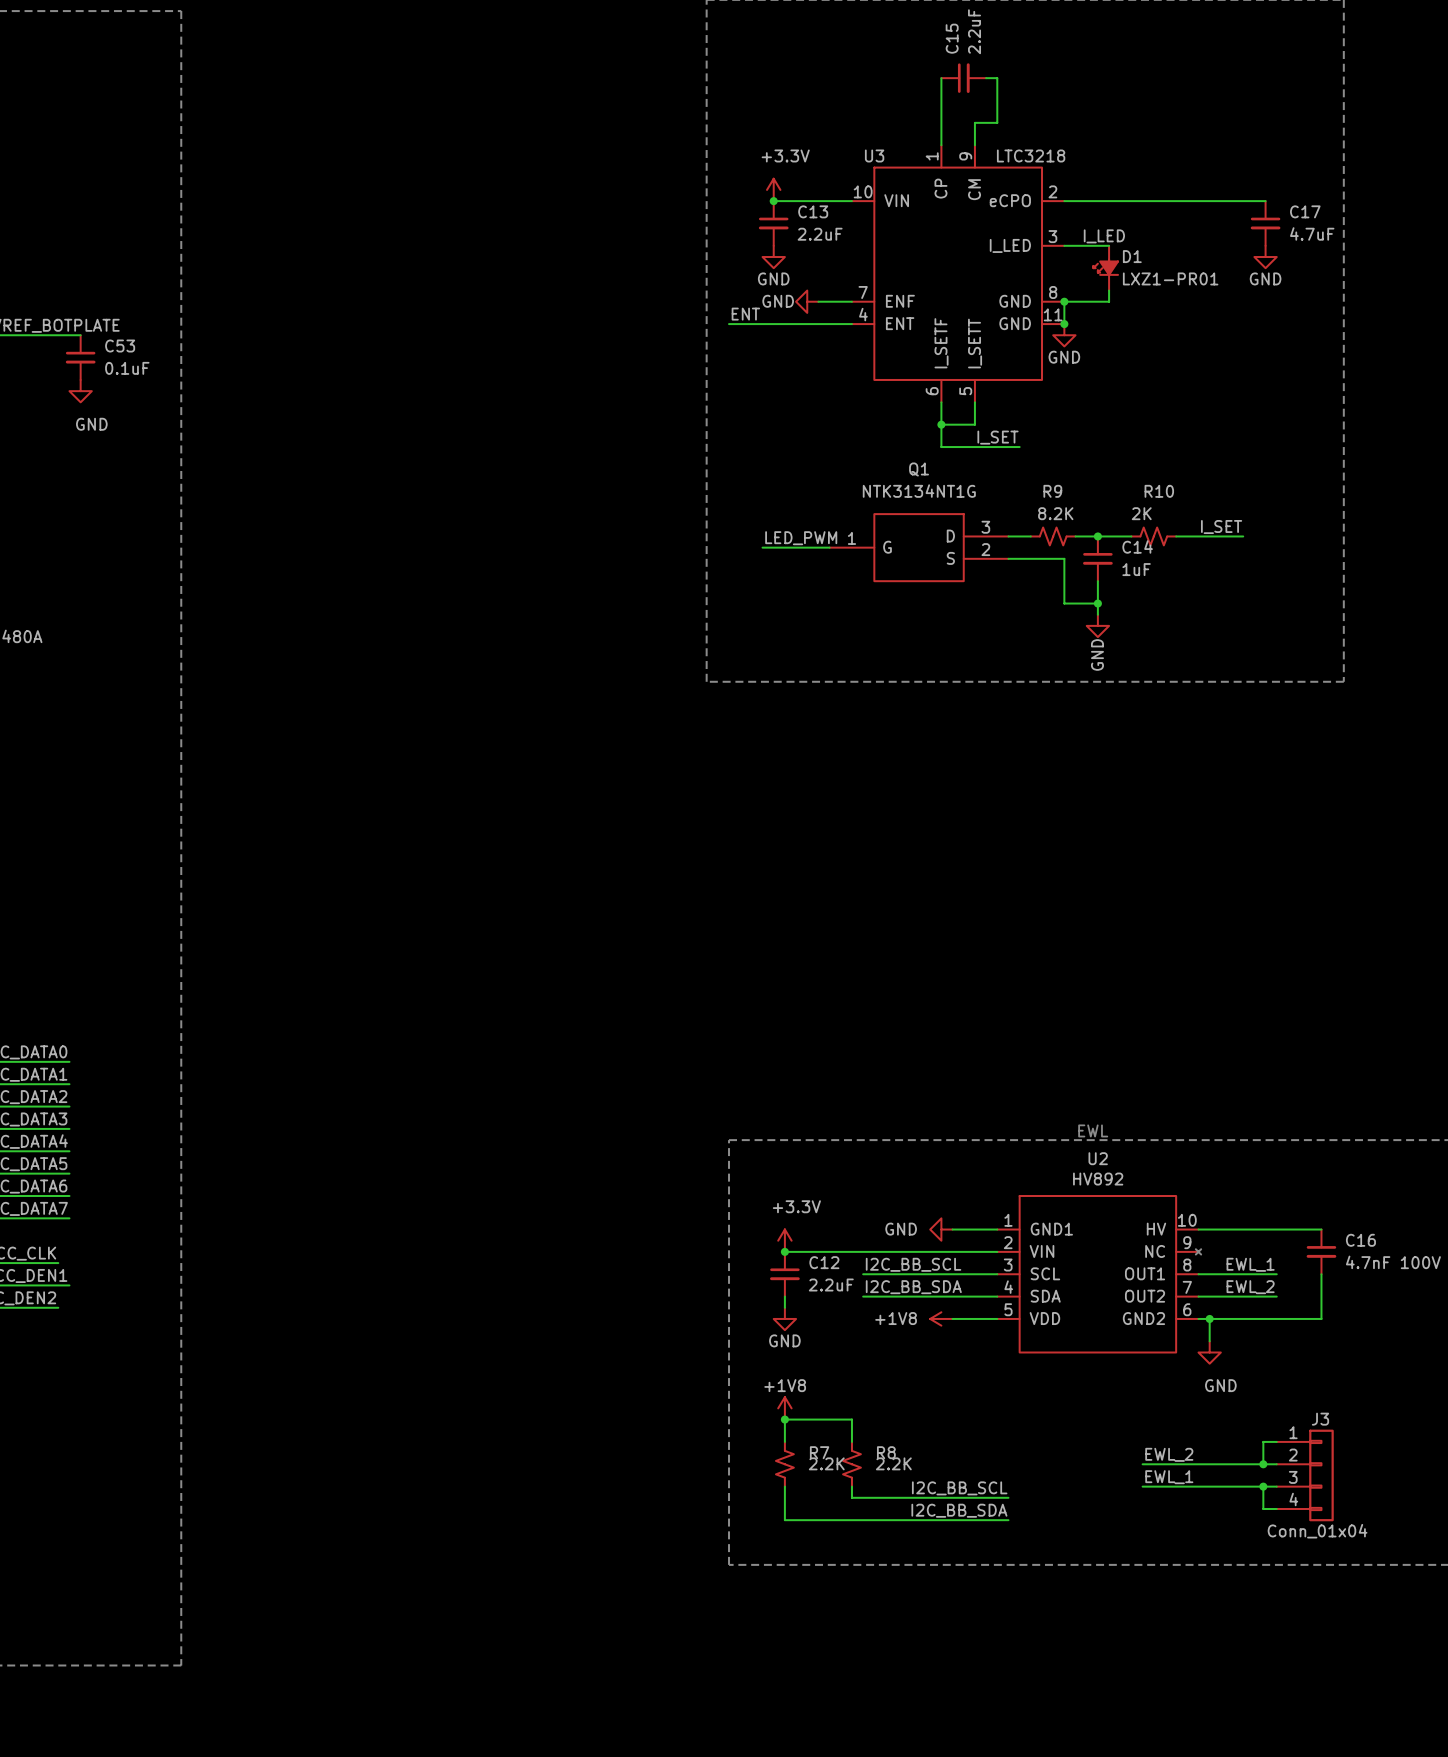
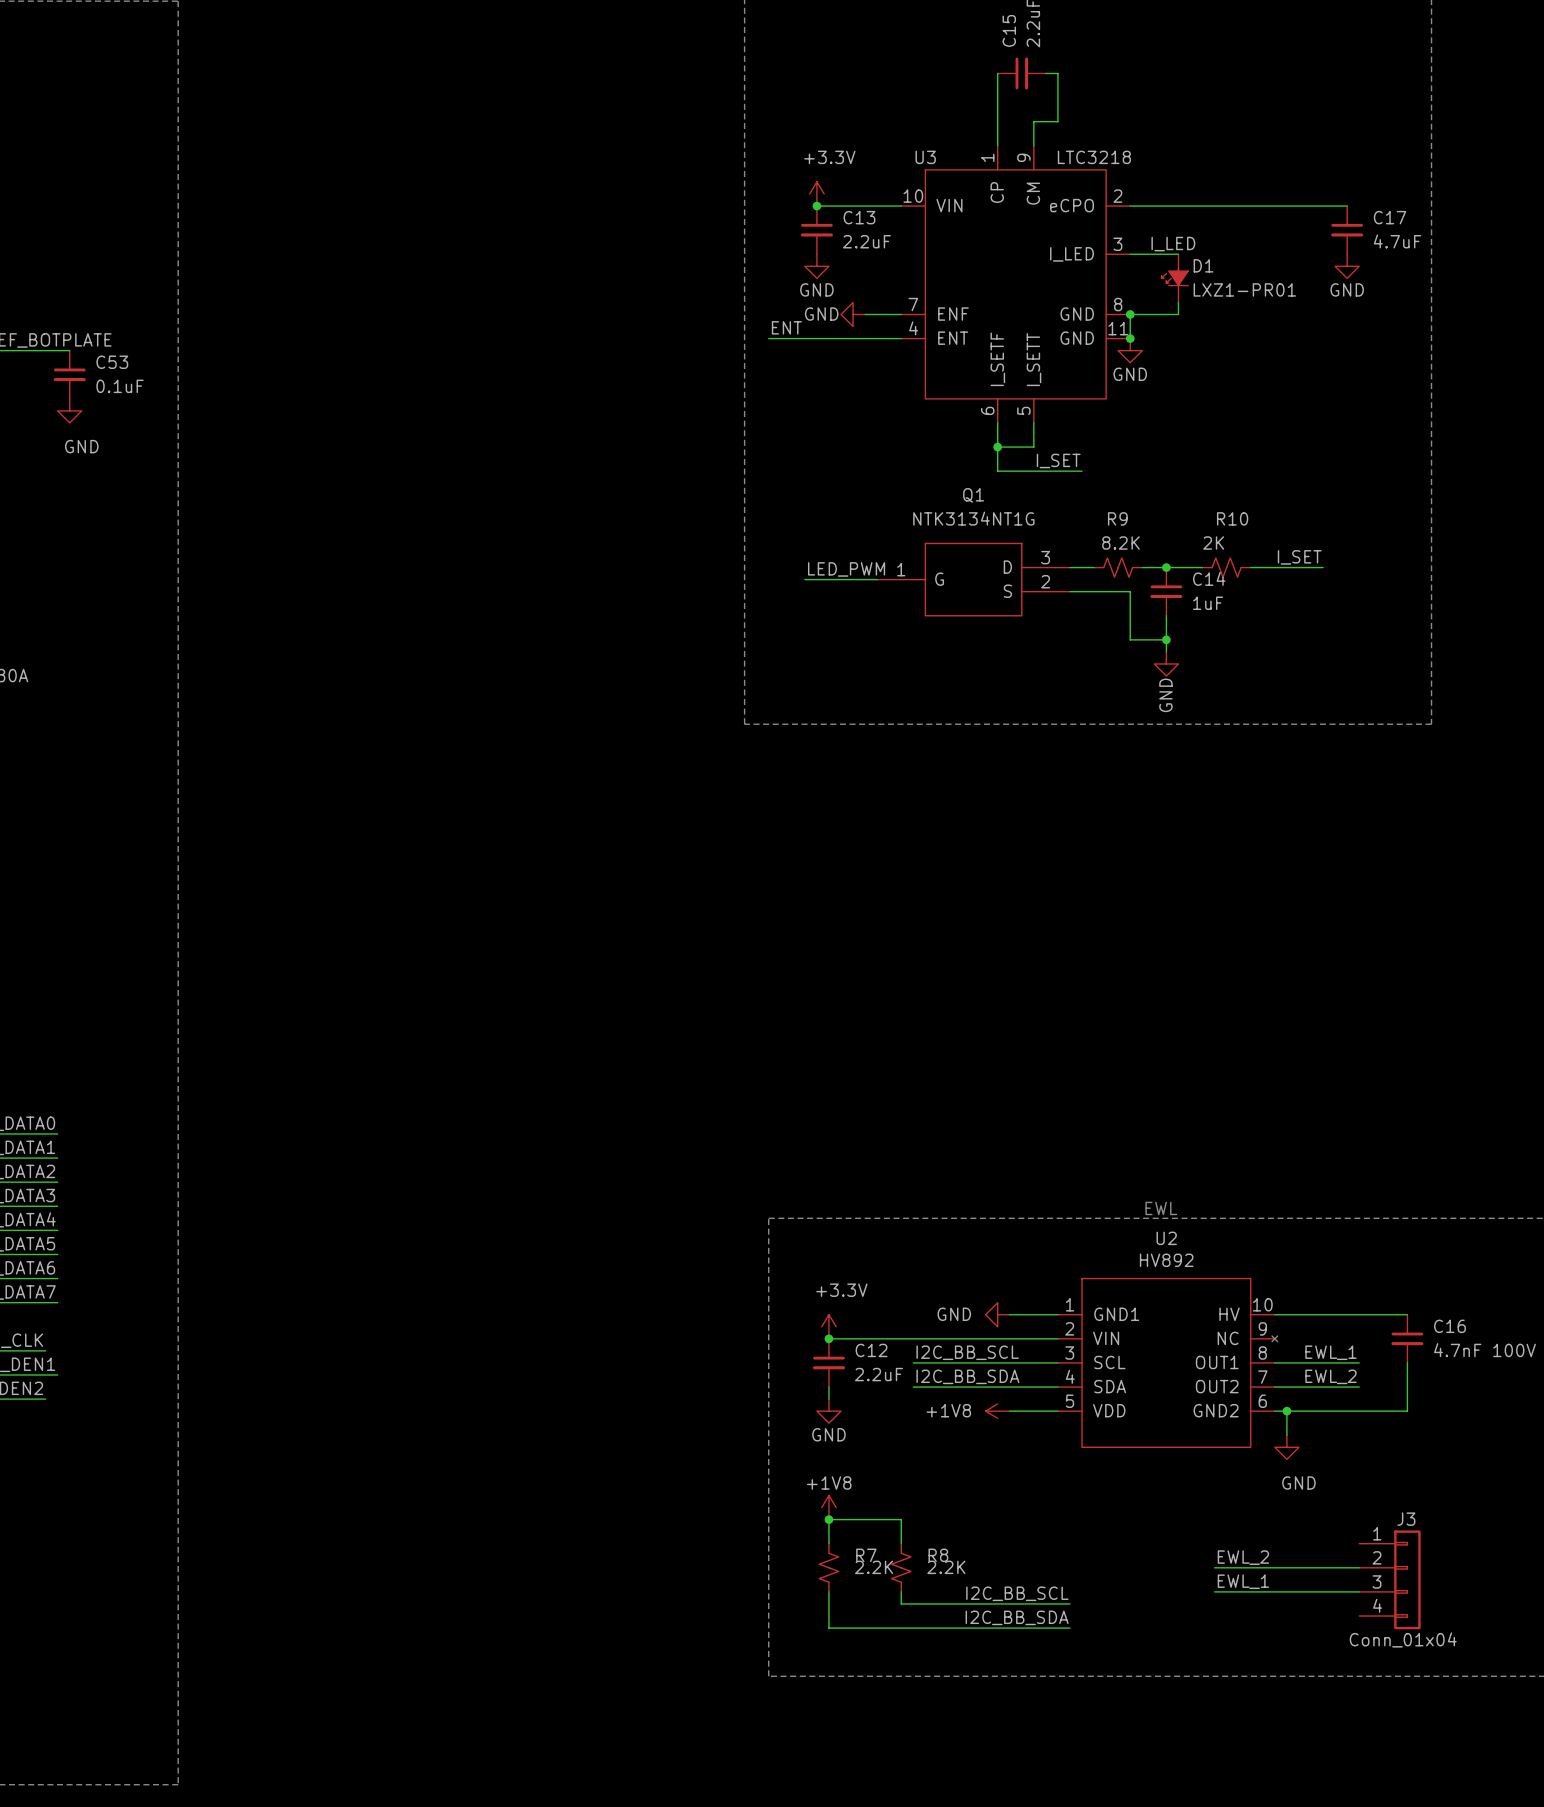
wire: (1276, 1441) (1263, 1441) (1263, 1464) -> none
junction: (1263, 1464) -> none
wire: (1263, 1486) (1263, 1508) (1276, 1508) -> none
junction: (1263, 1486) -> none

